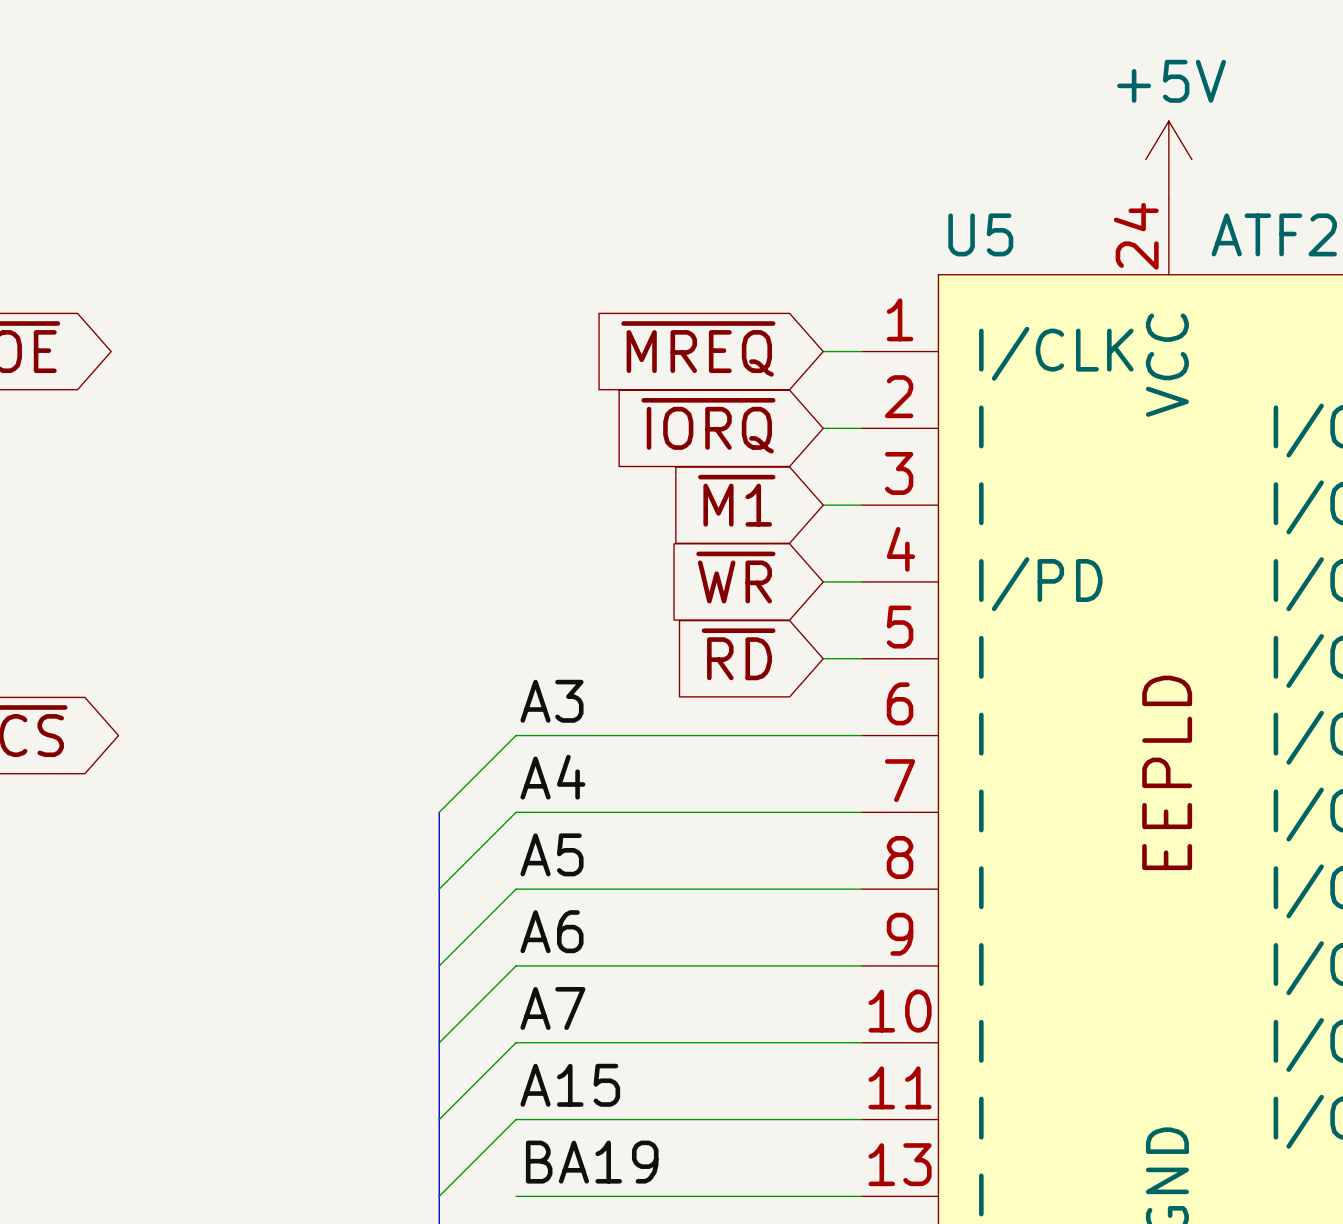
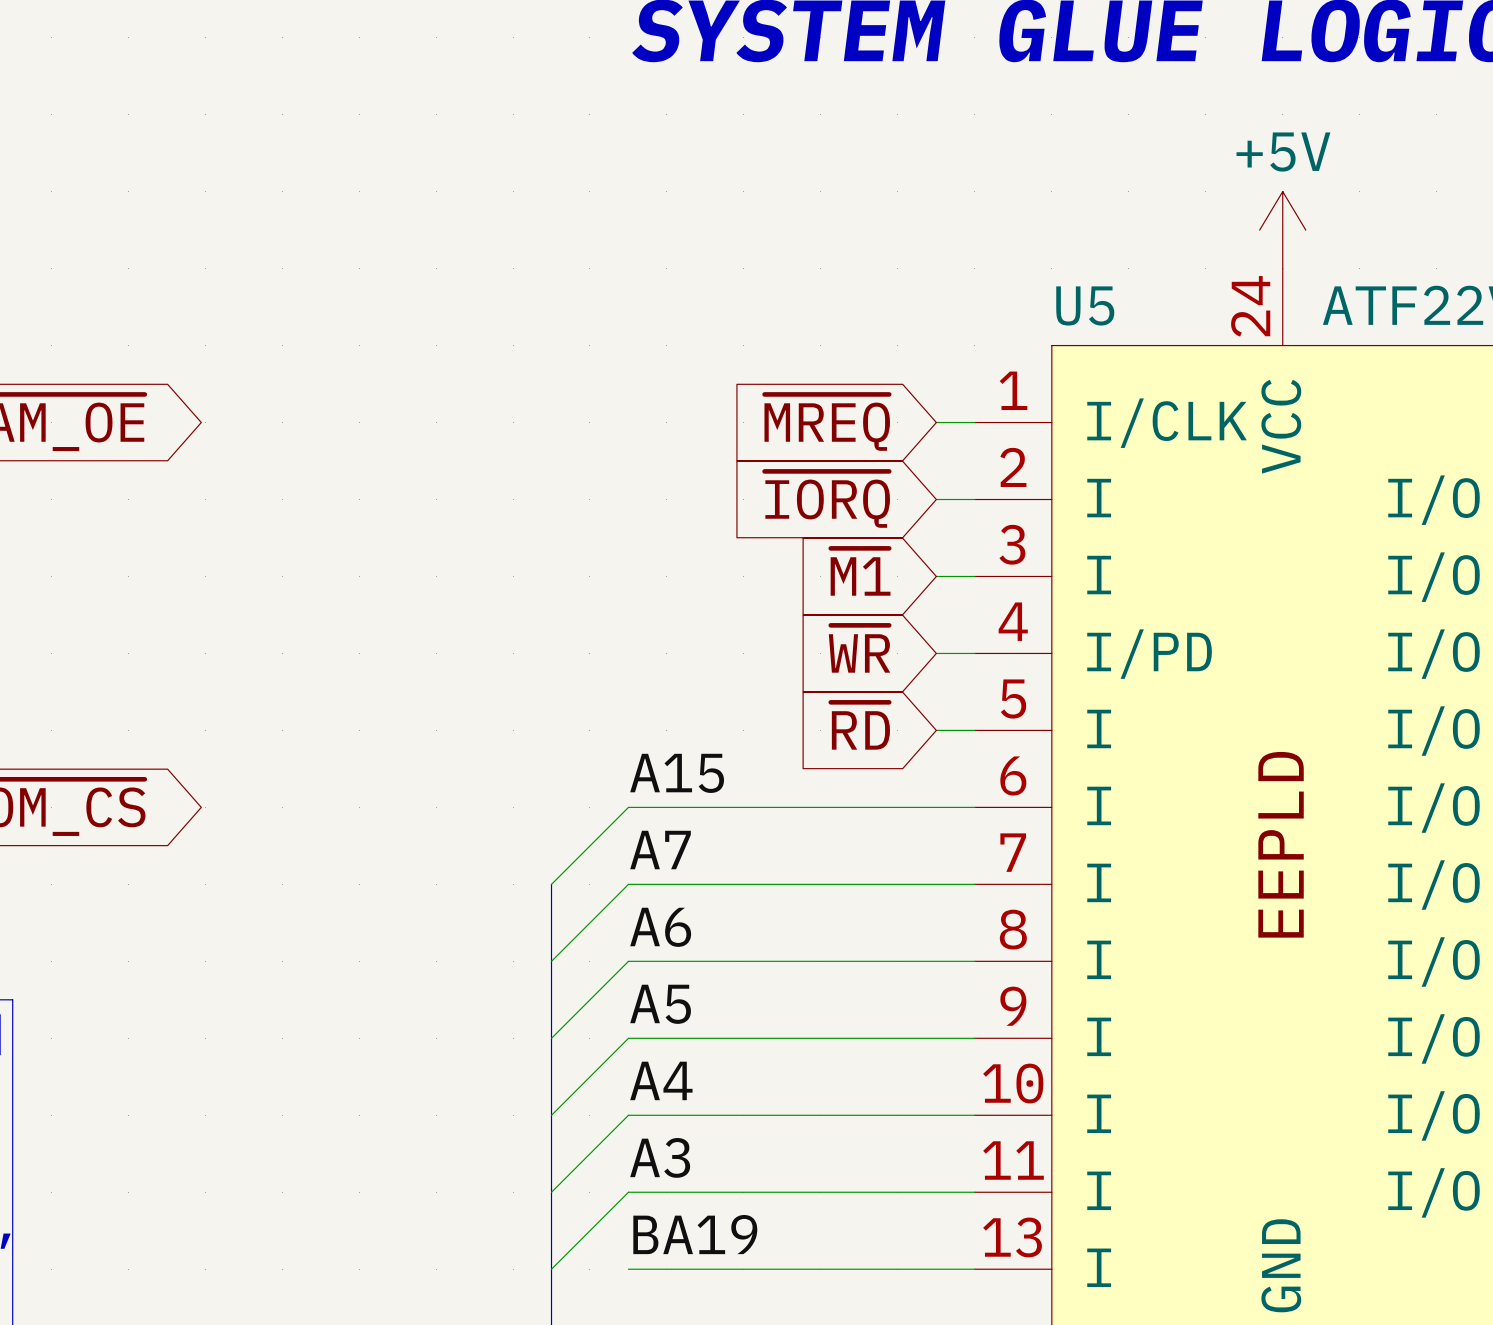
label: A3 (551, 701) -> A15 (677, 773)
label: A4 (552, 777) -> A7 (660, 850)
label: A5 (551, 854) -> A6 (660, 927)
label: A6 (551, 931) -> A5 (660, 1004)
label: A7 (552, 1008) -> A4 (661, 1080)
label: A15 (570, 1085) -> A3 (660, 1157)

